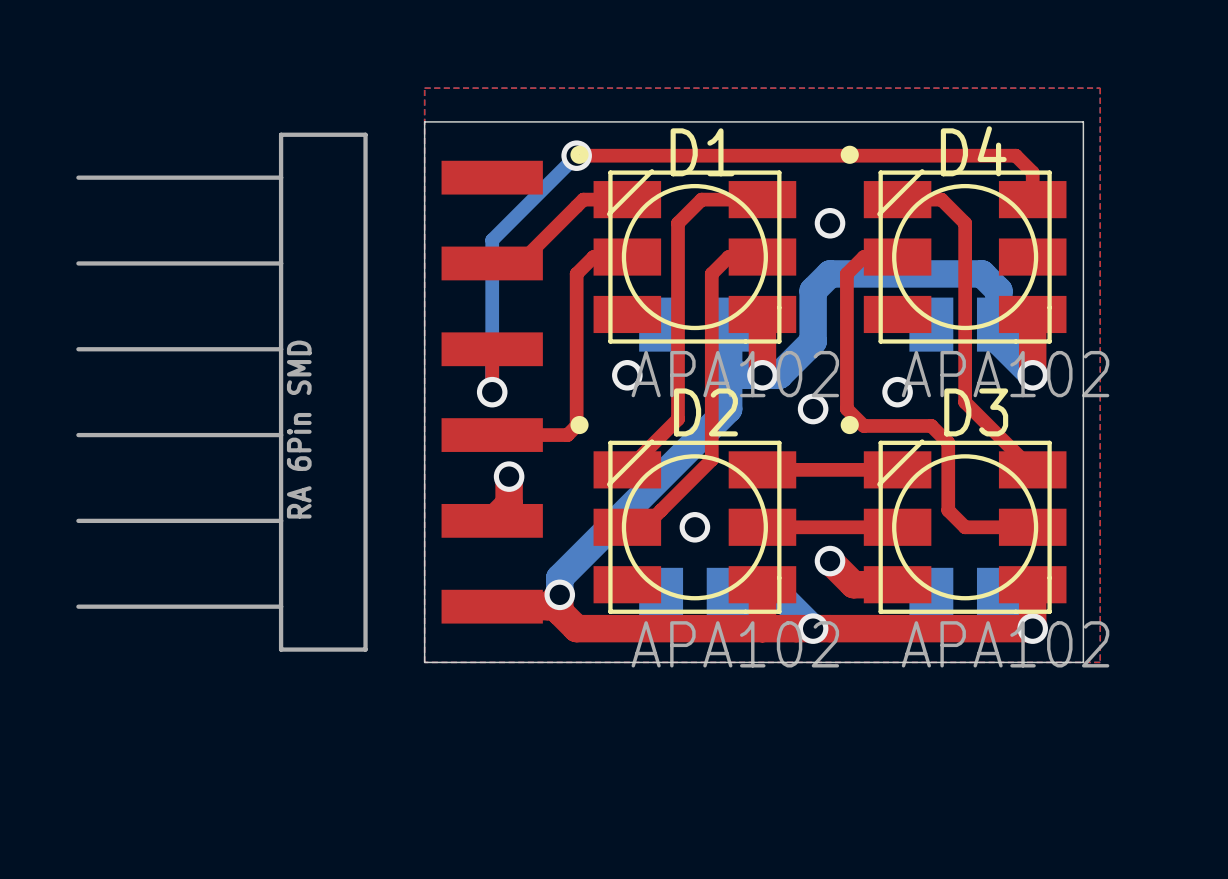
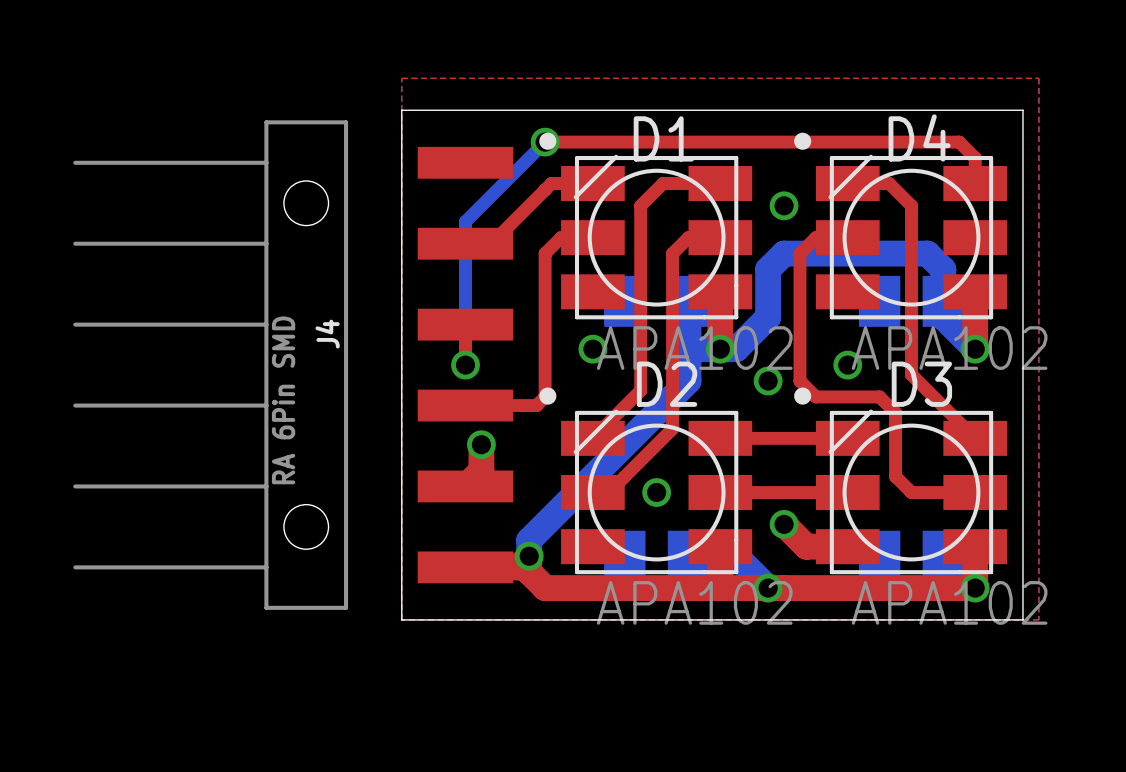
J4: none -> RA 6Pin SMD (293, 365)

